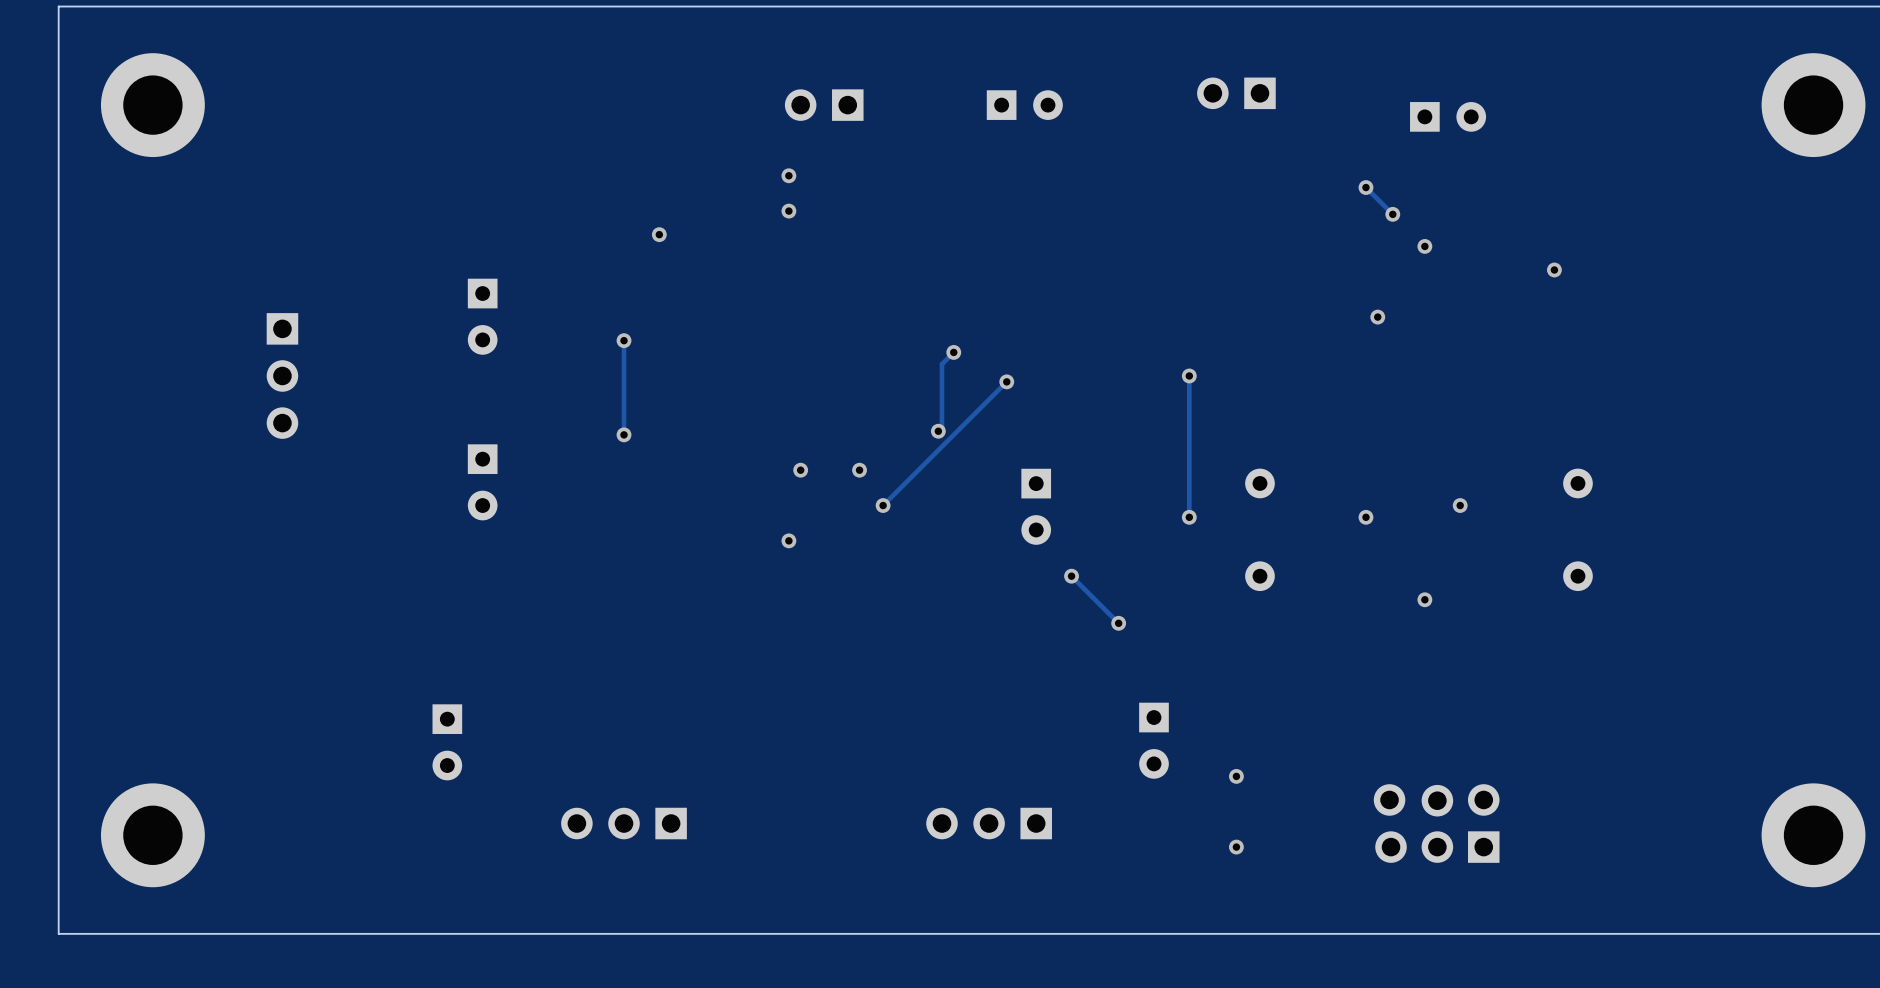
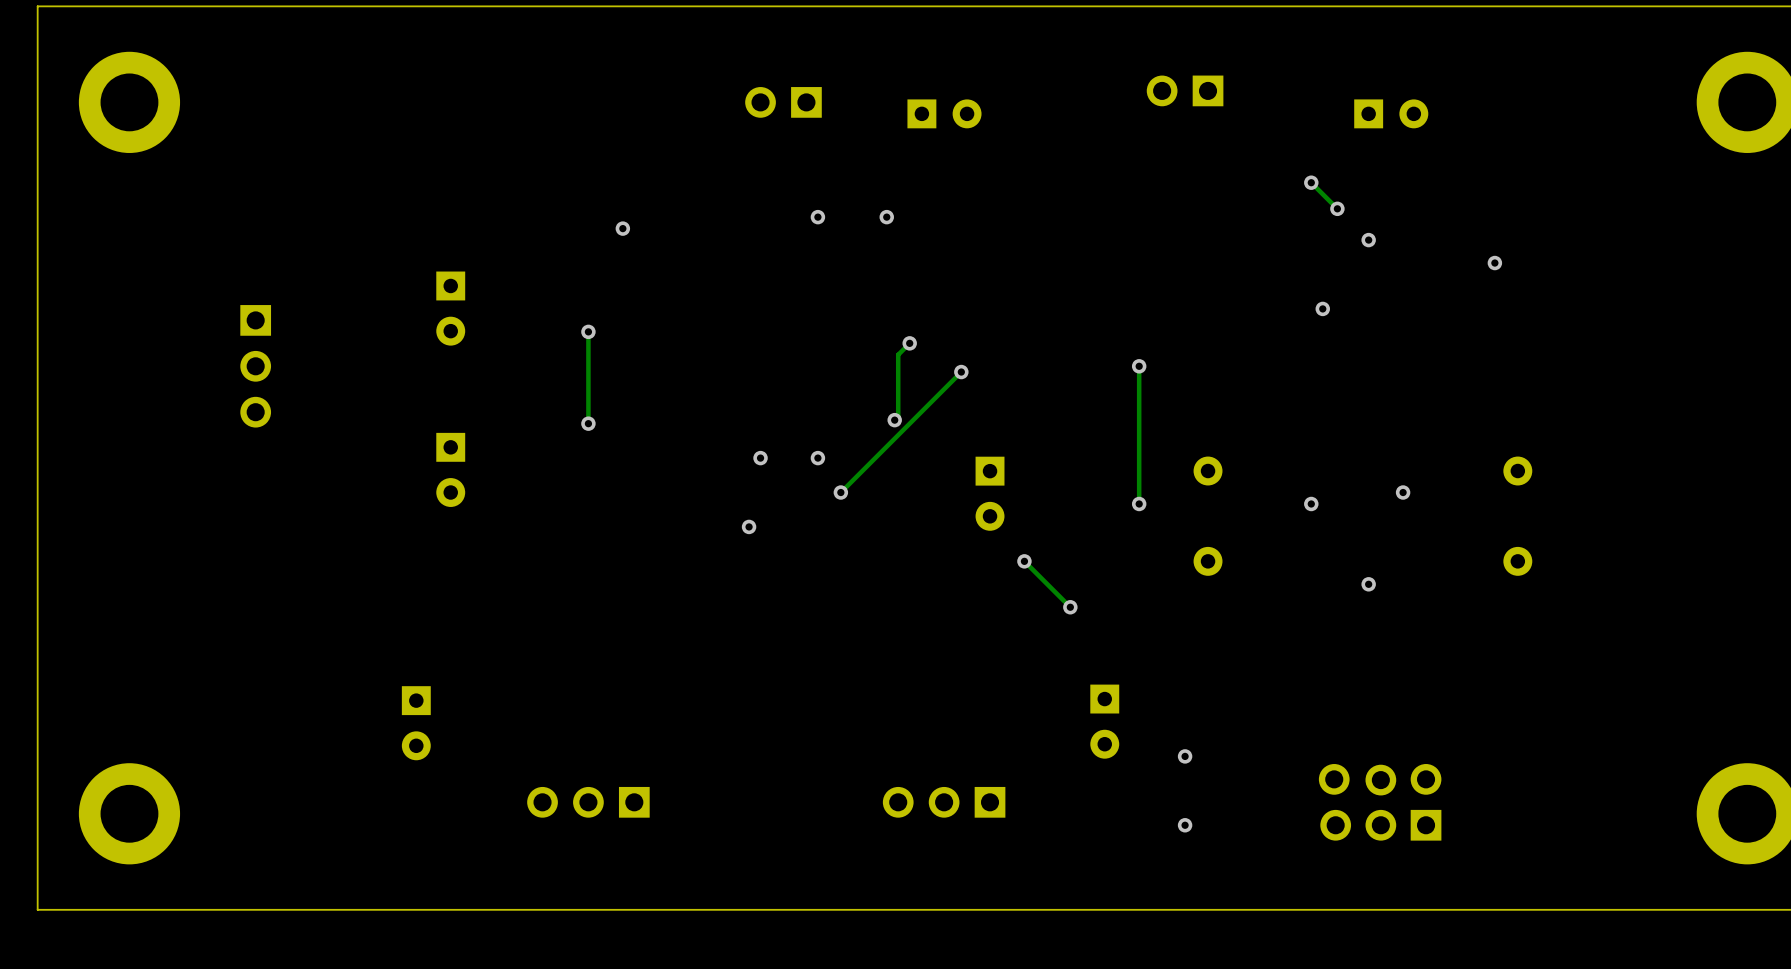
part position: (1024, 105) -> (944, 113)
via: (788, 175) -> none
via: (788, 211) -> none
via: none -> (817, 217)
via: none -> (886, 217)

